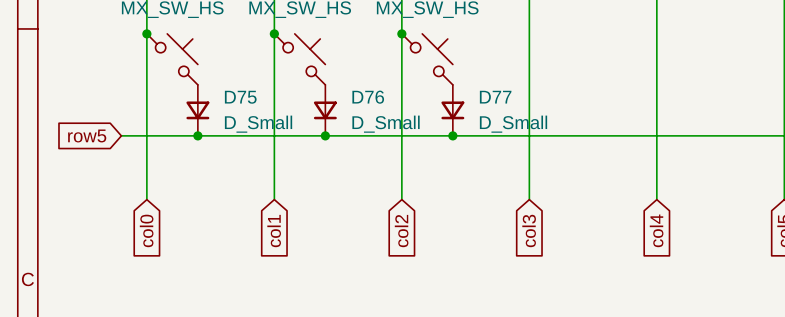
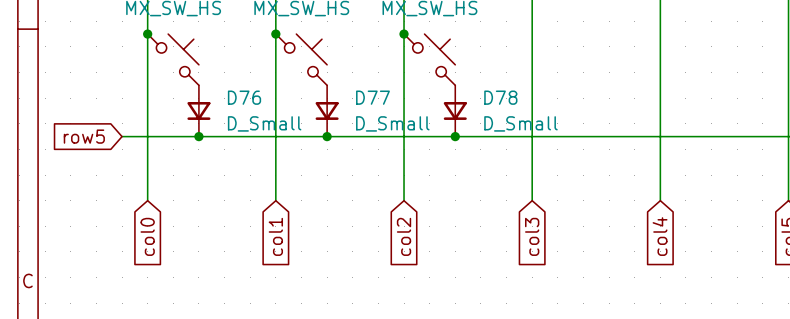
D75 name: D75 (240, 97) -> D76 (244, 97)
D76 name: D76 (368, 97) -> D77 (372, 97)
D77 name: D77 (495, 97) -> D78 (500, 97)

